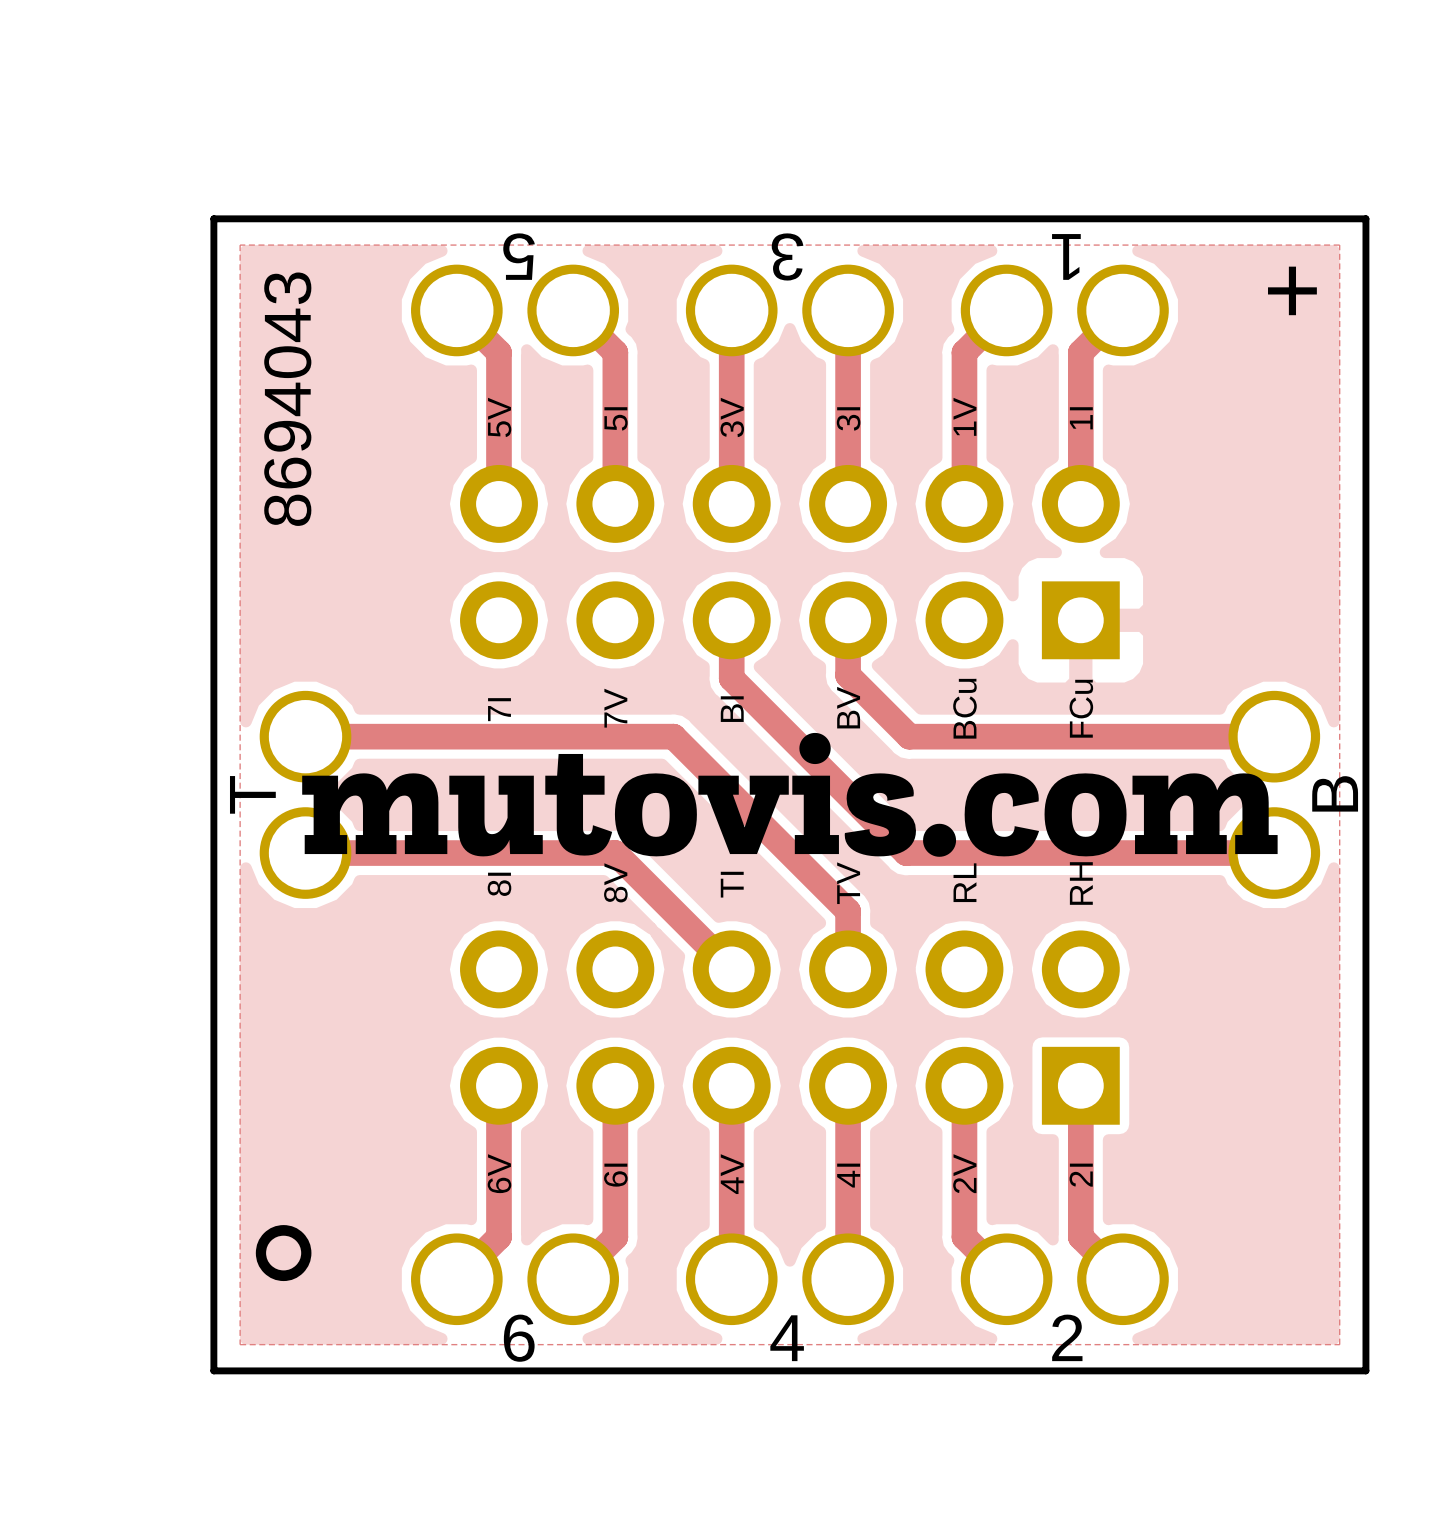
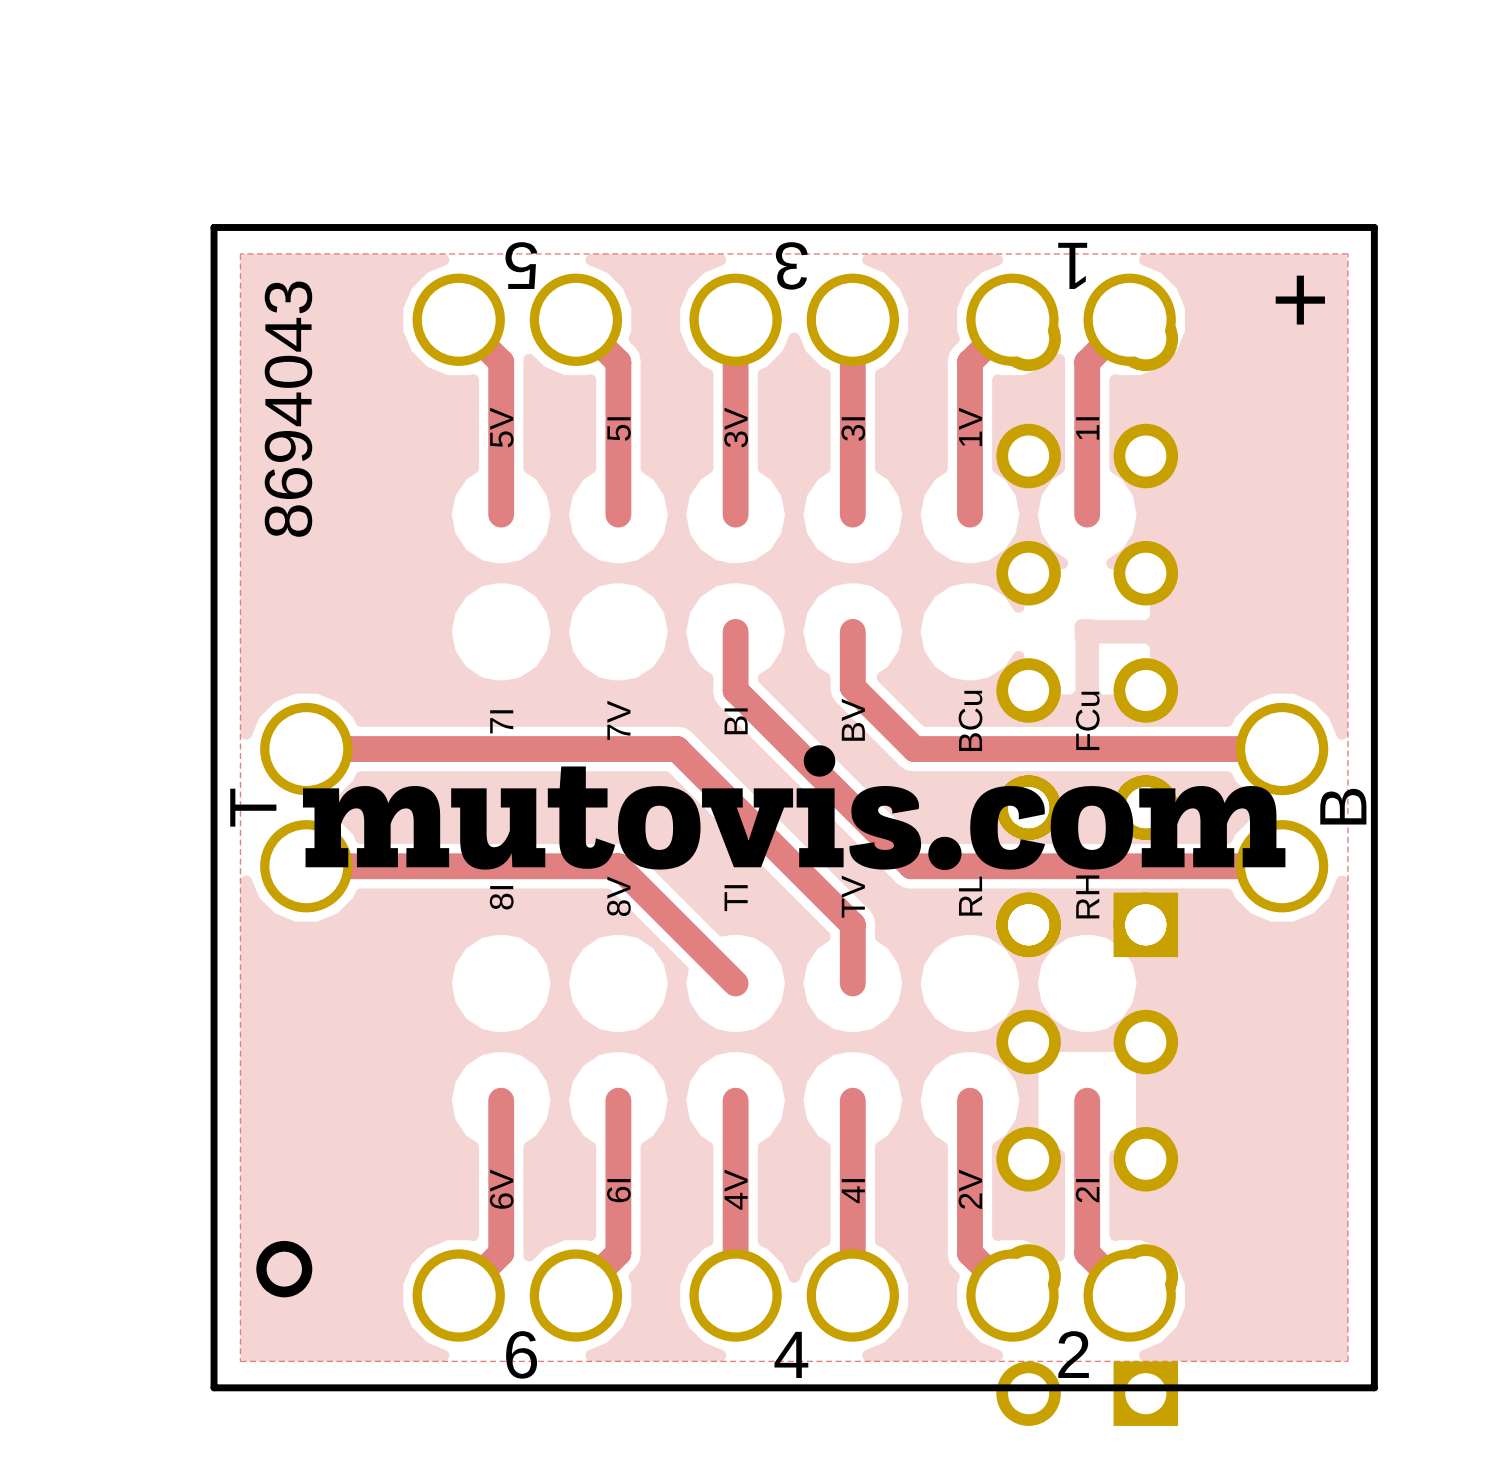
part: (789, 562) -> none
part: none -> (1087, 631)
part: (789, 1027) -> none
part: none -> (1087, 1100)

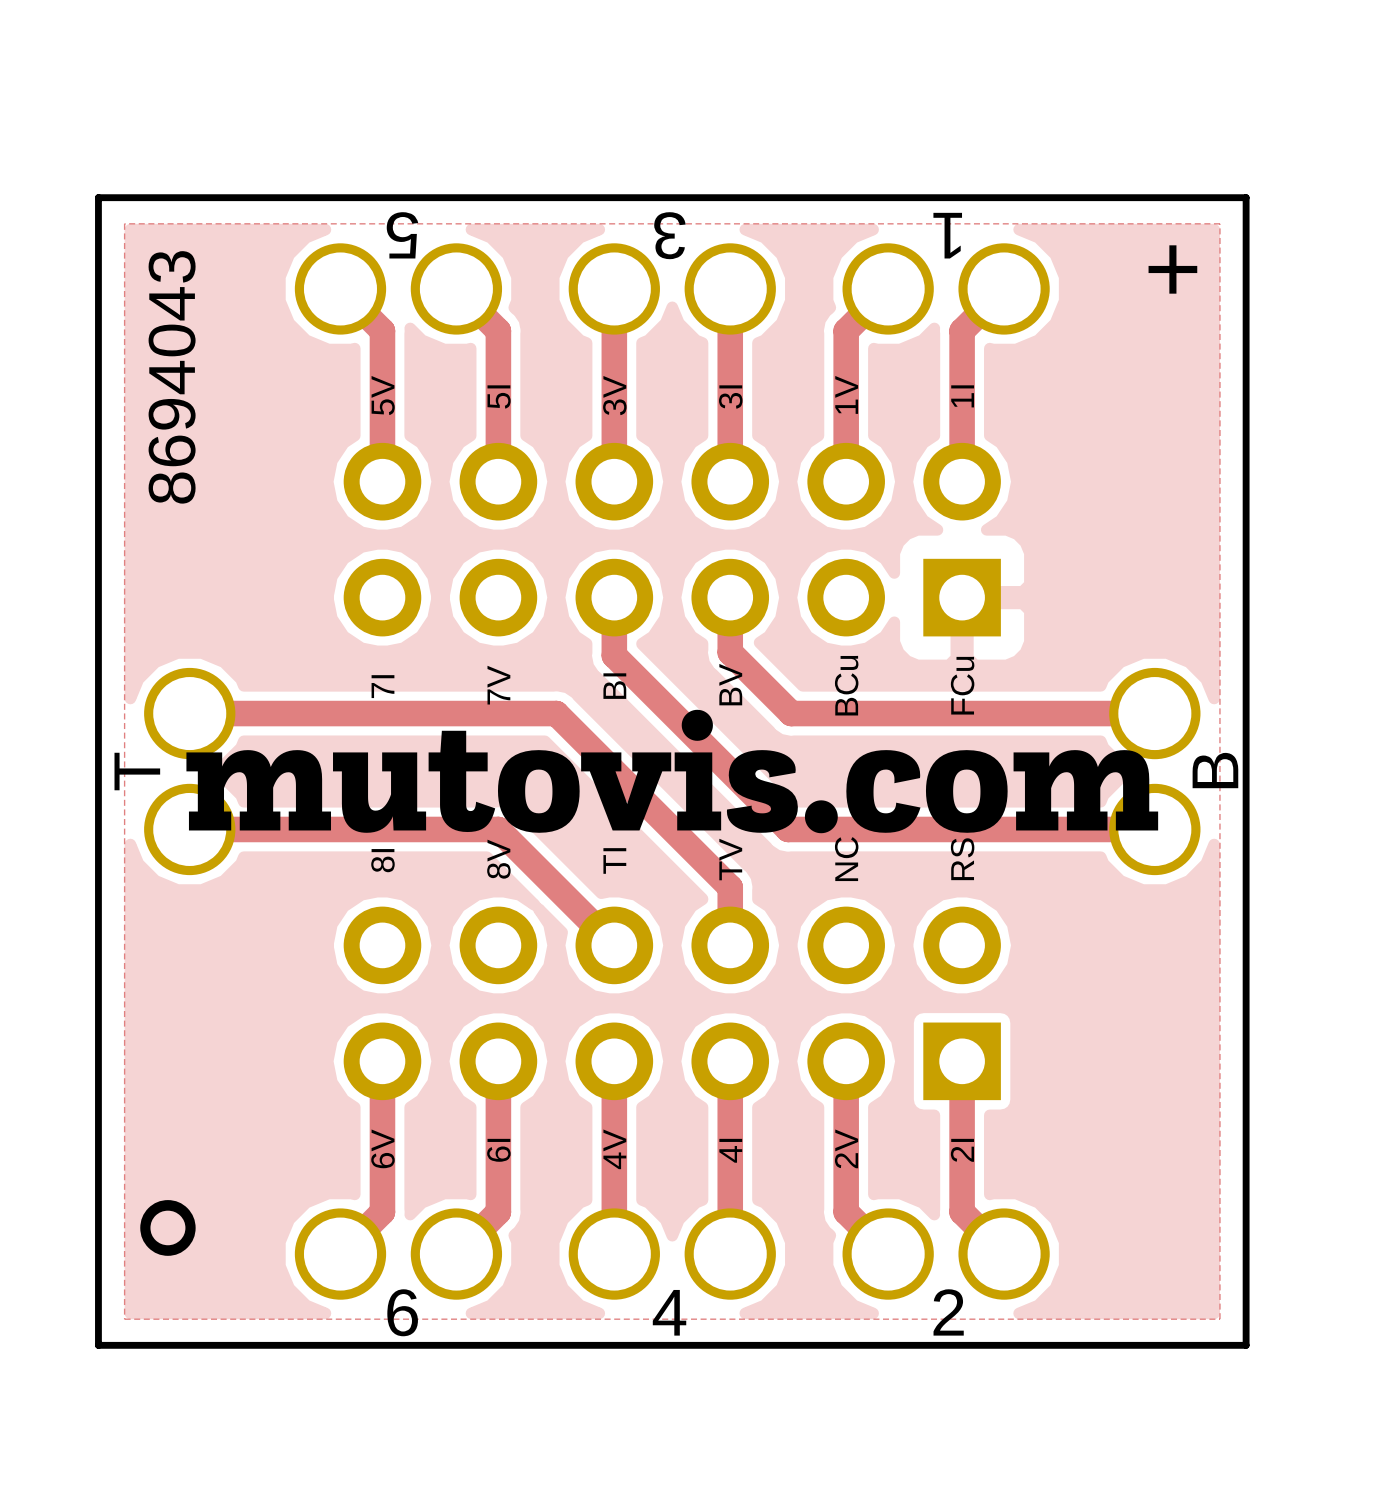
part: none -> (672, 539)
part: (1087, 631) -> none
text: RL (970, 896) -> NC (846, 859)
text: RH (1087, 896) -> RS (962, 859)
part: none -> (672, 1003)
part: (1087, 1100) -> none

